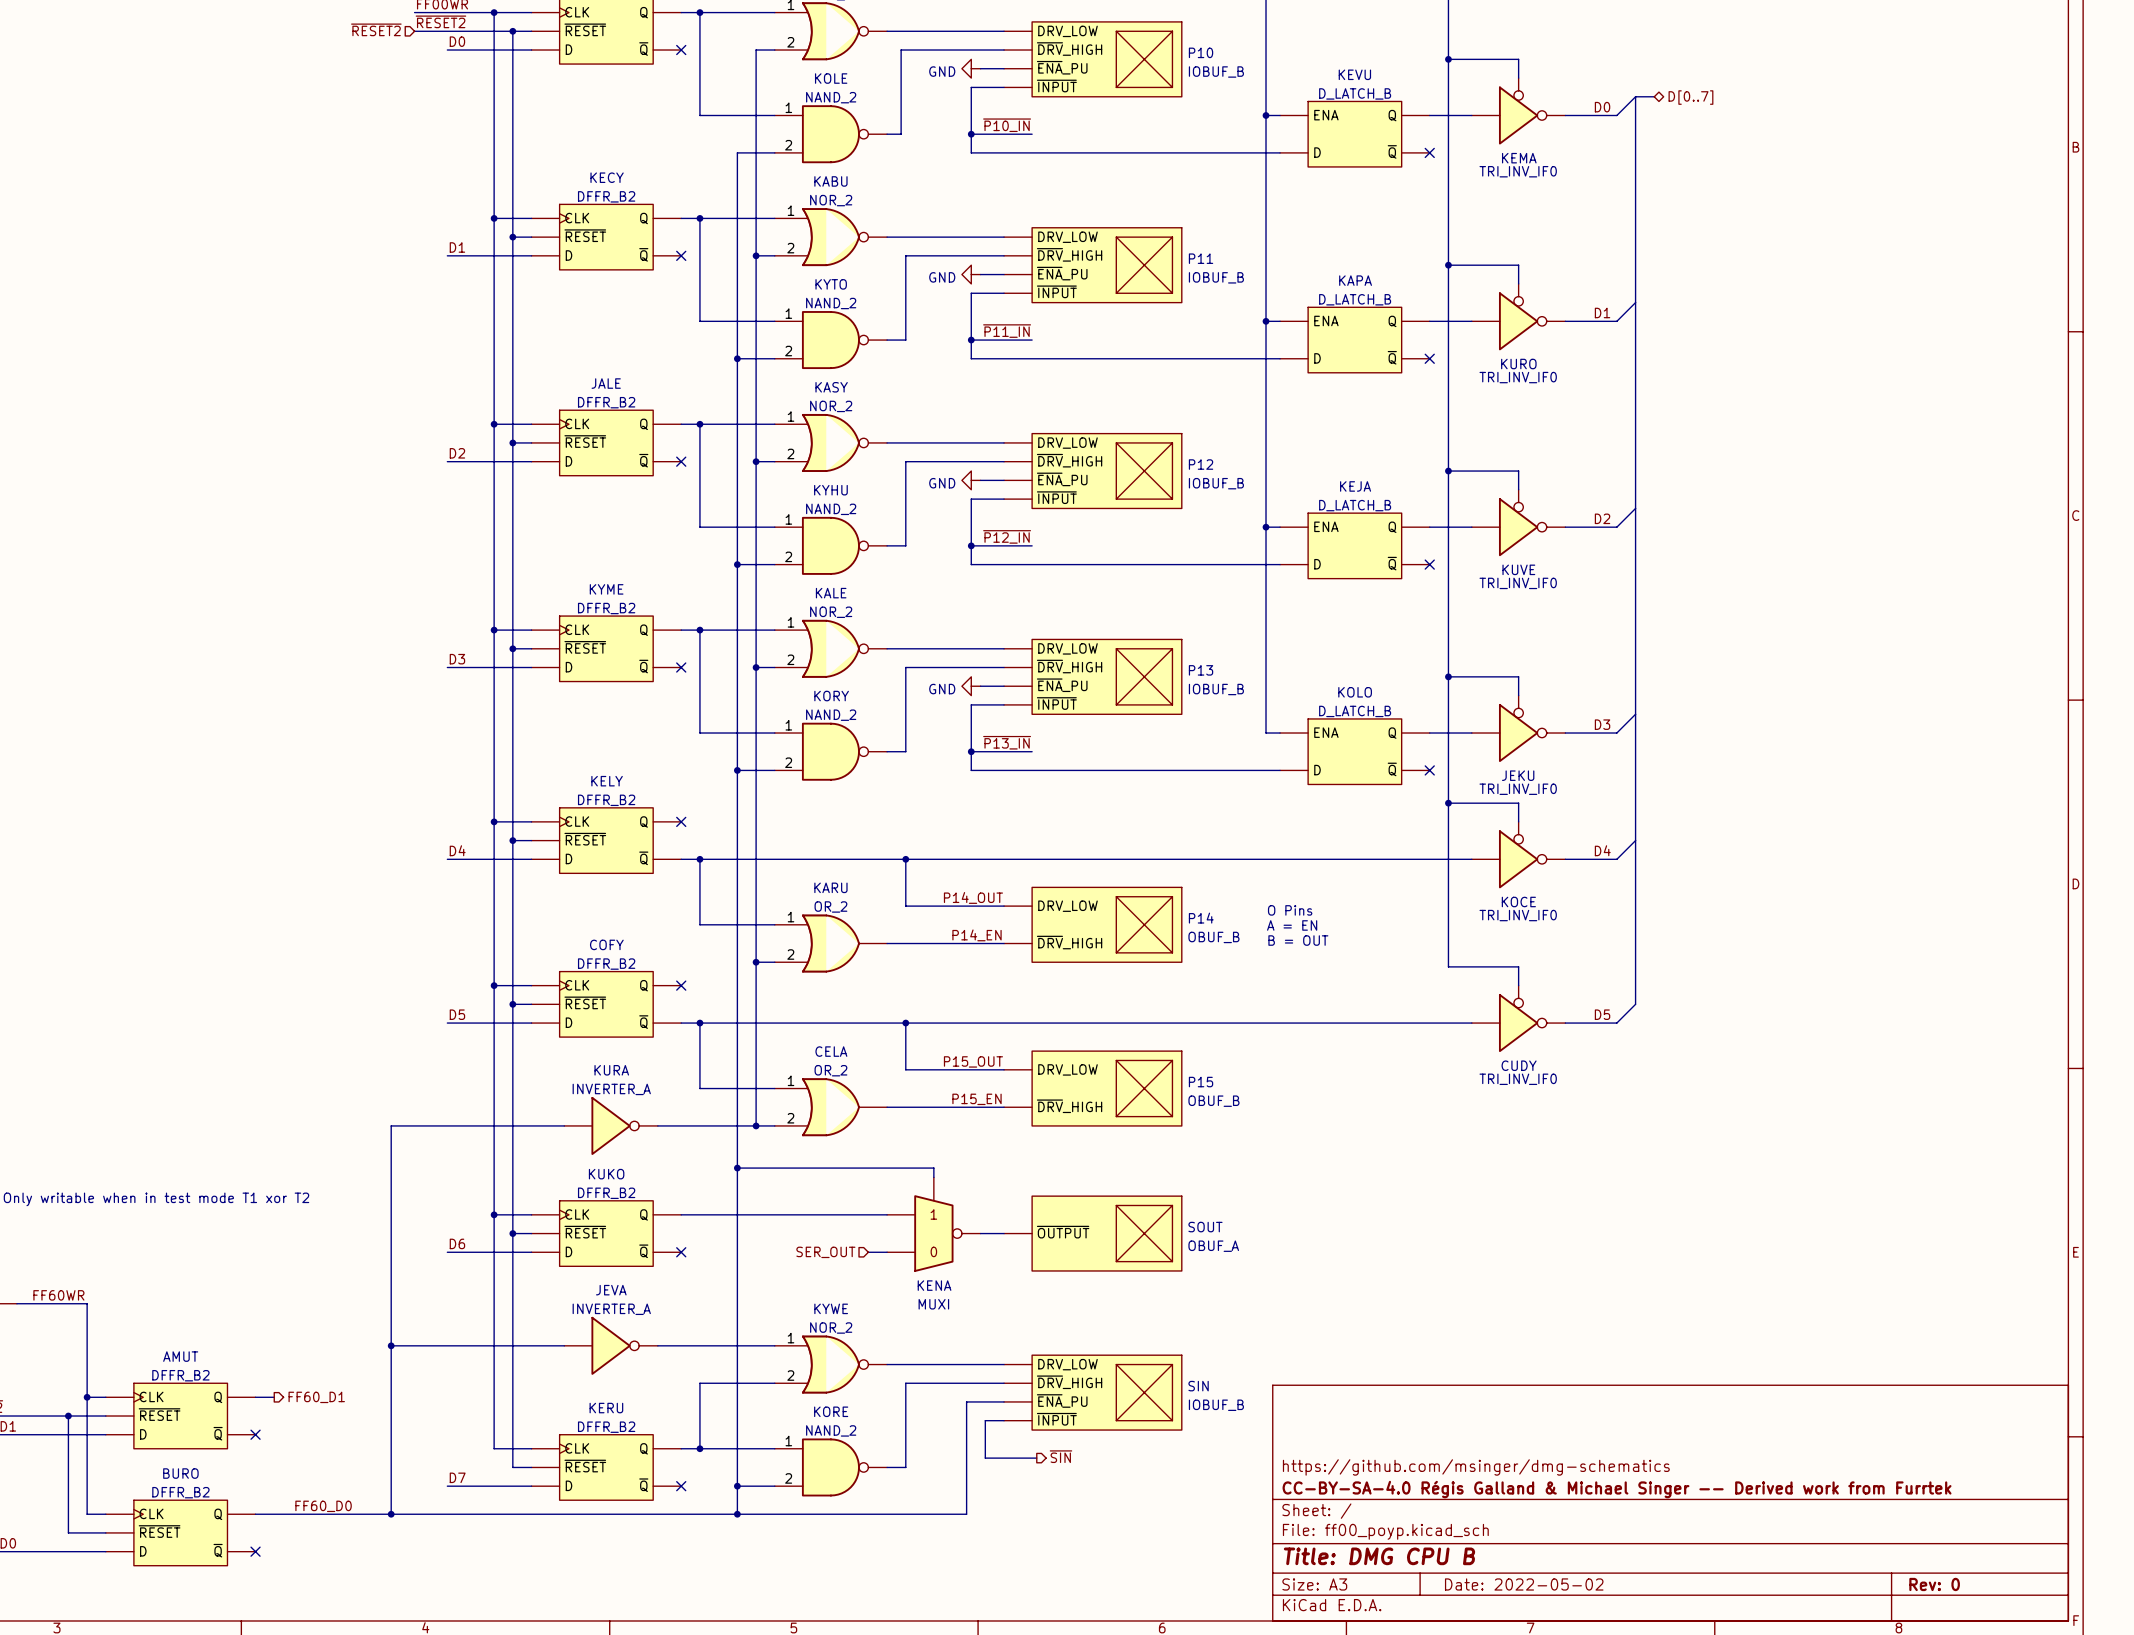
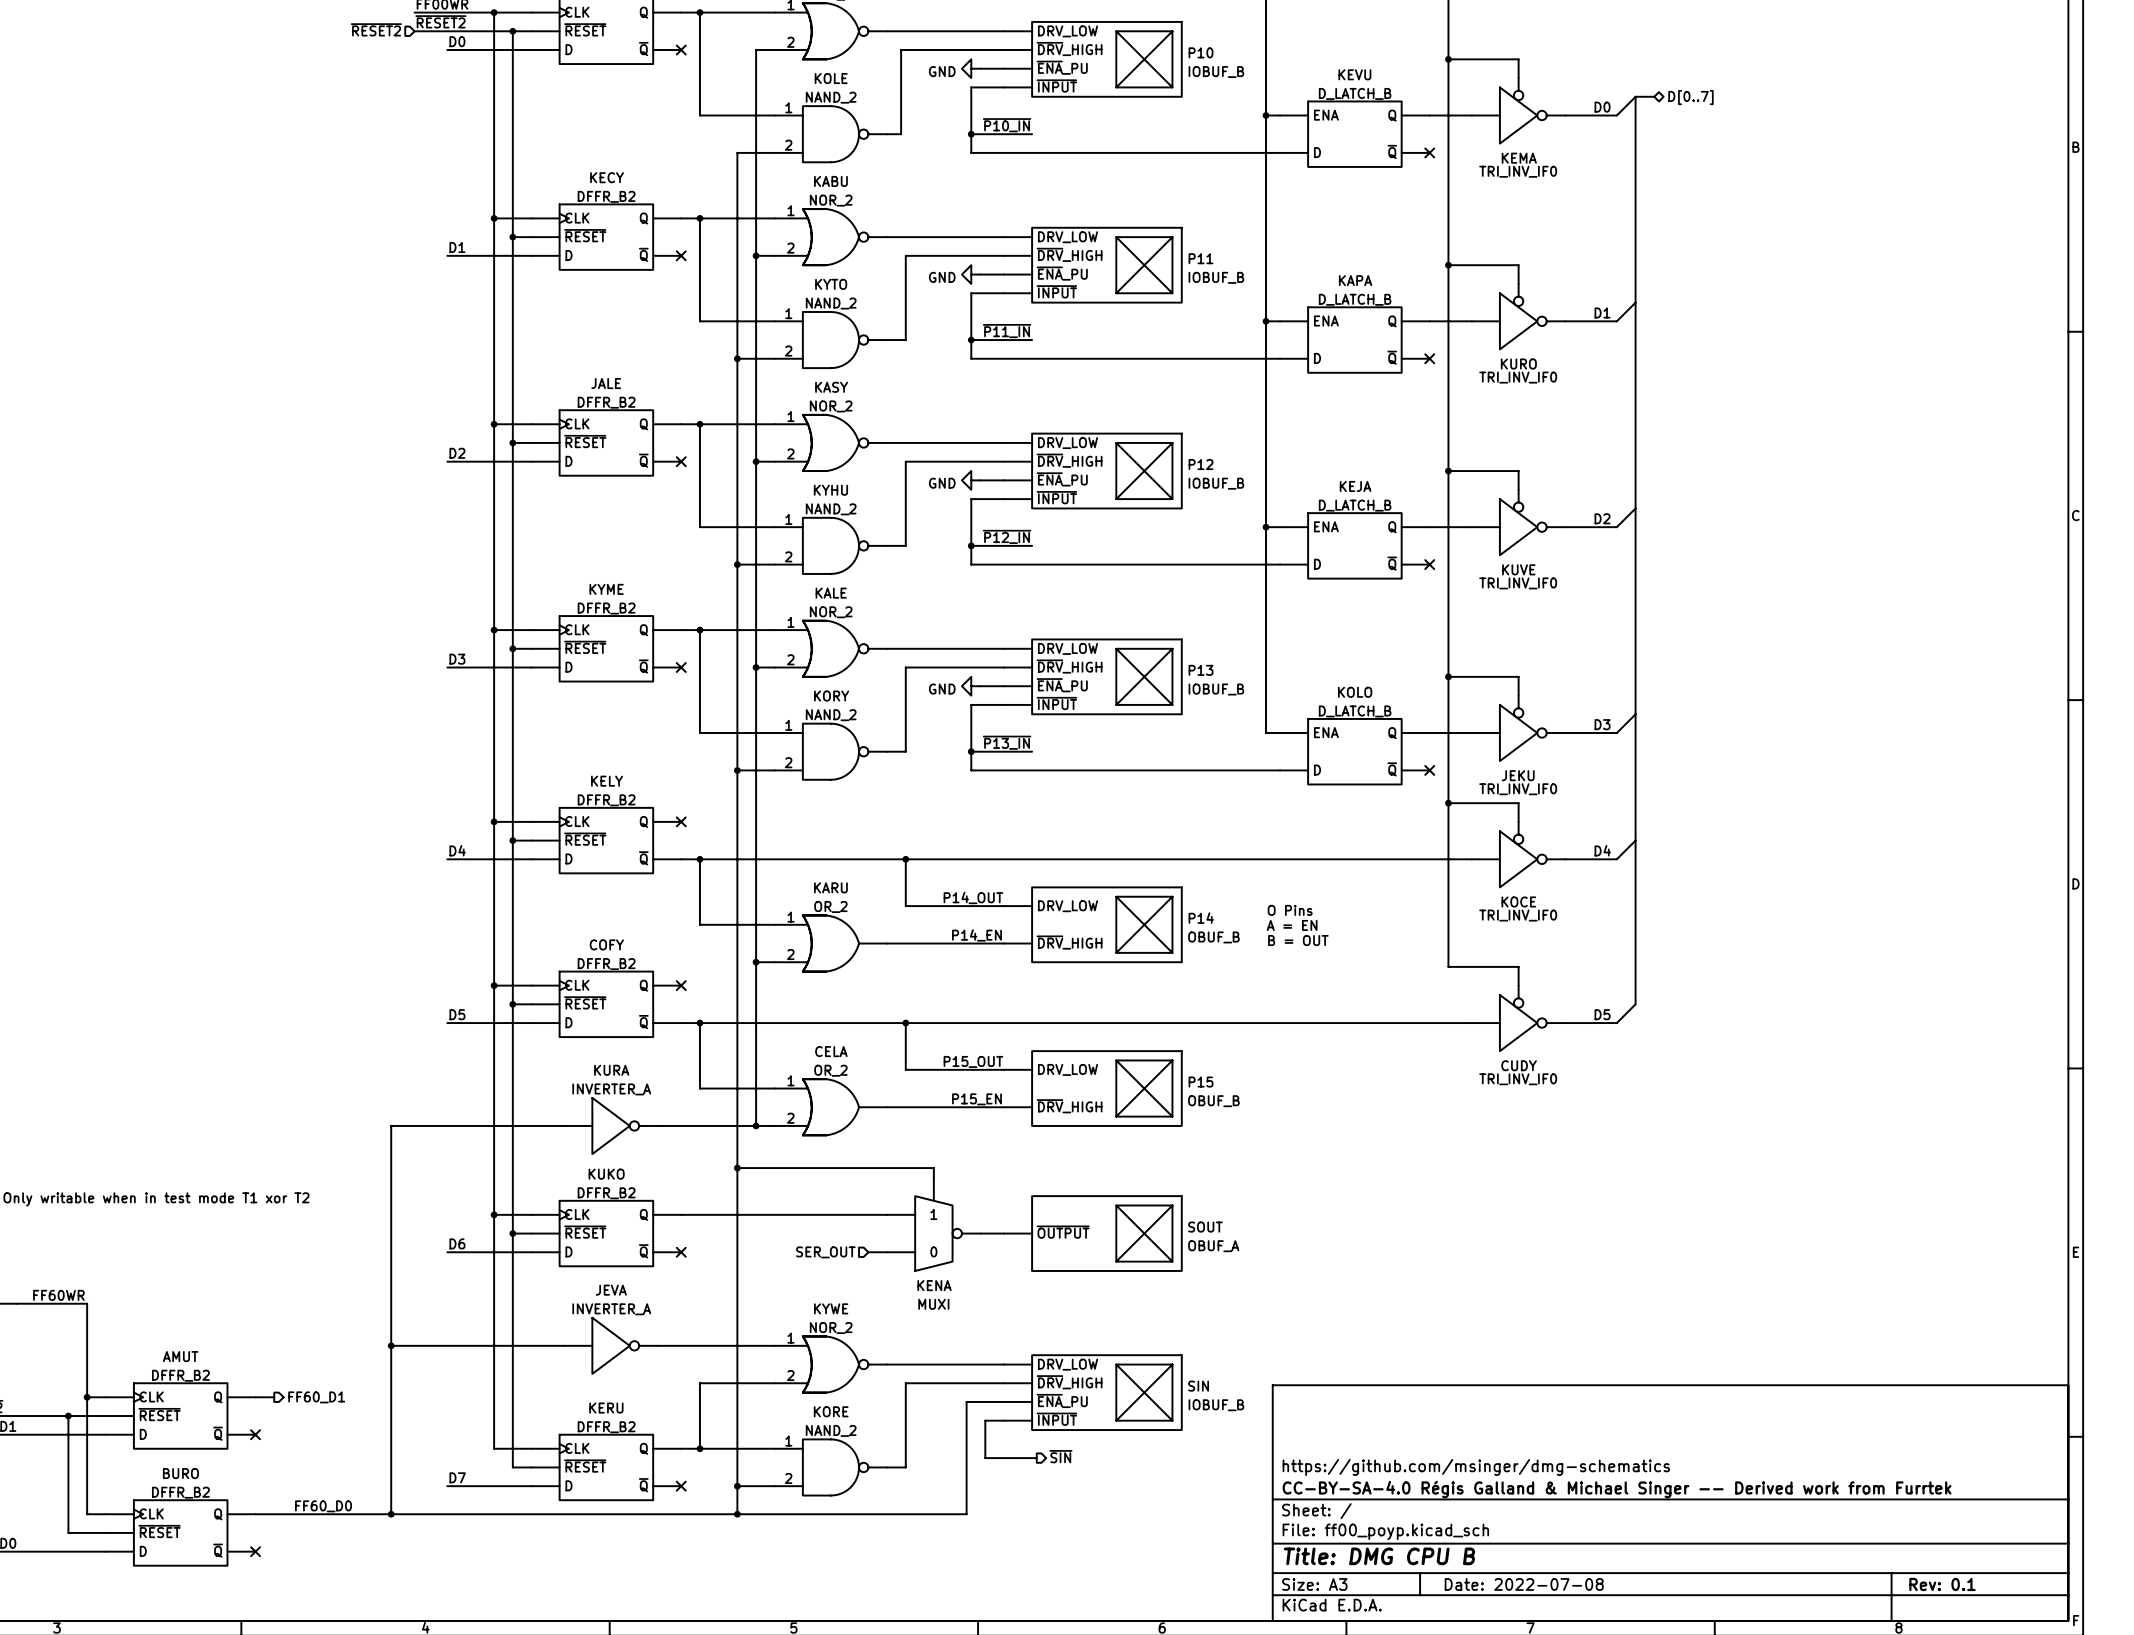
title block: Date: 2022-05-02 (1524, 1584) -> Date: 2022-07-08 (1524, 1584)
title block: Rev: 0 (1934, 1584) -> Rev: 0.1 (1942, 1584)

